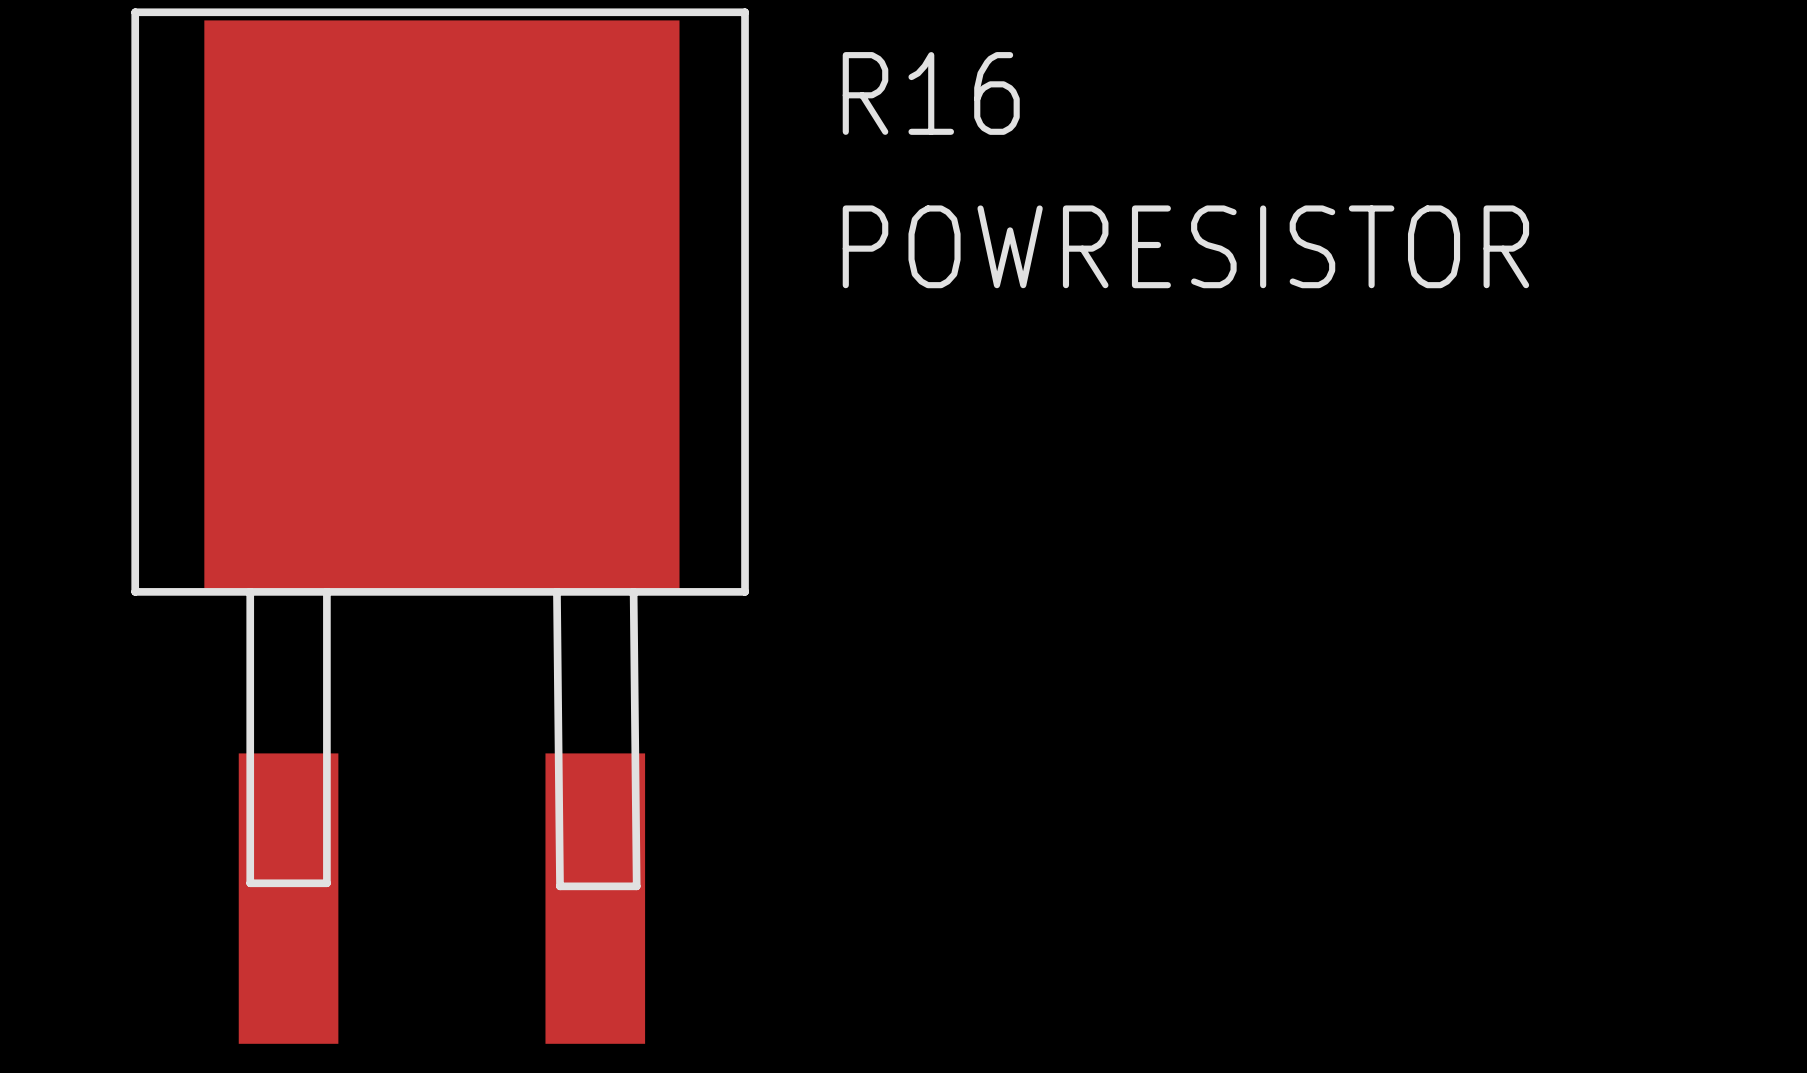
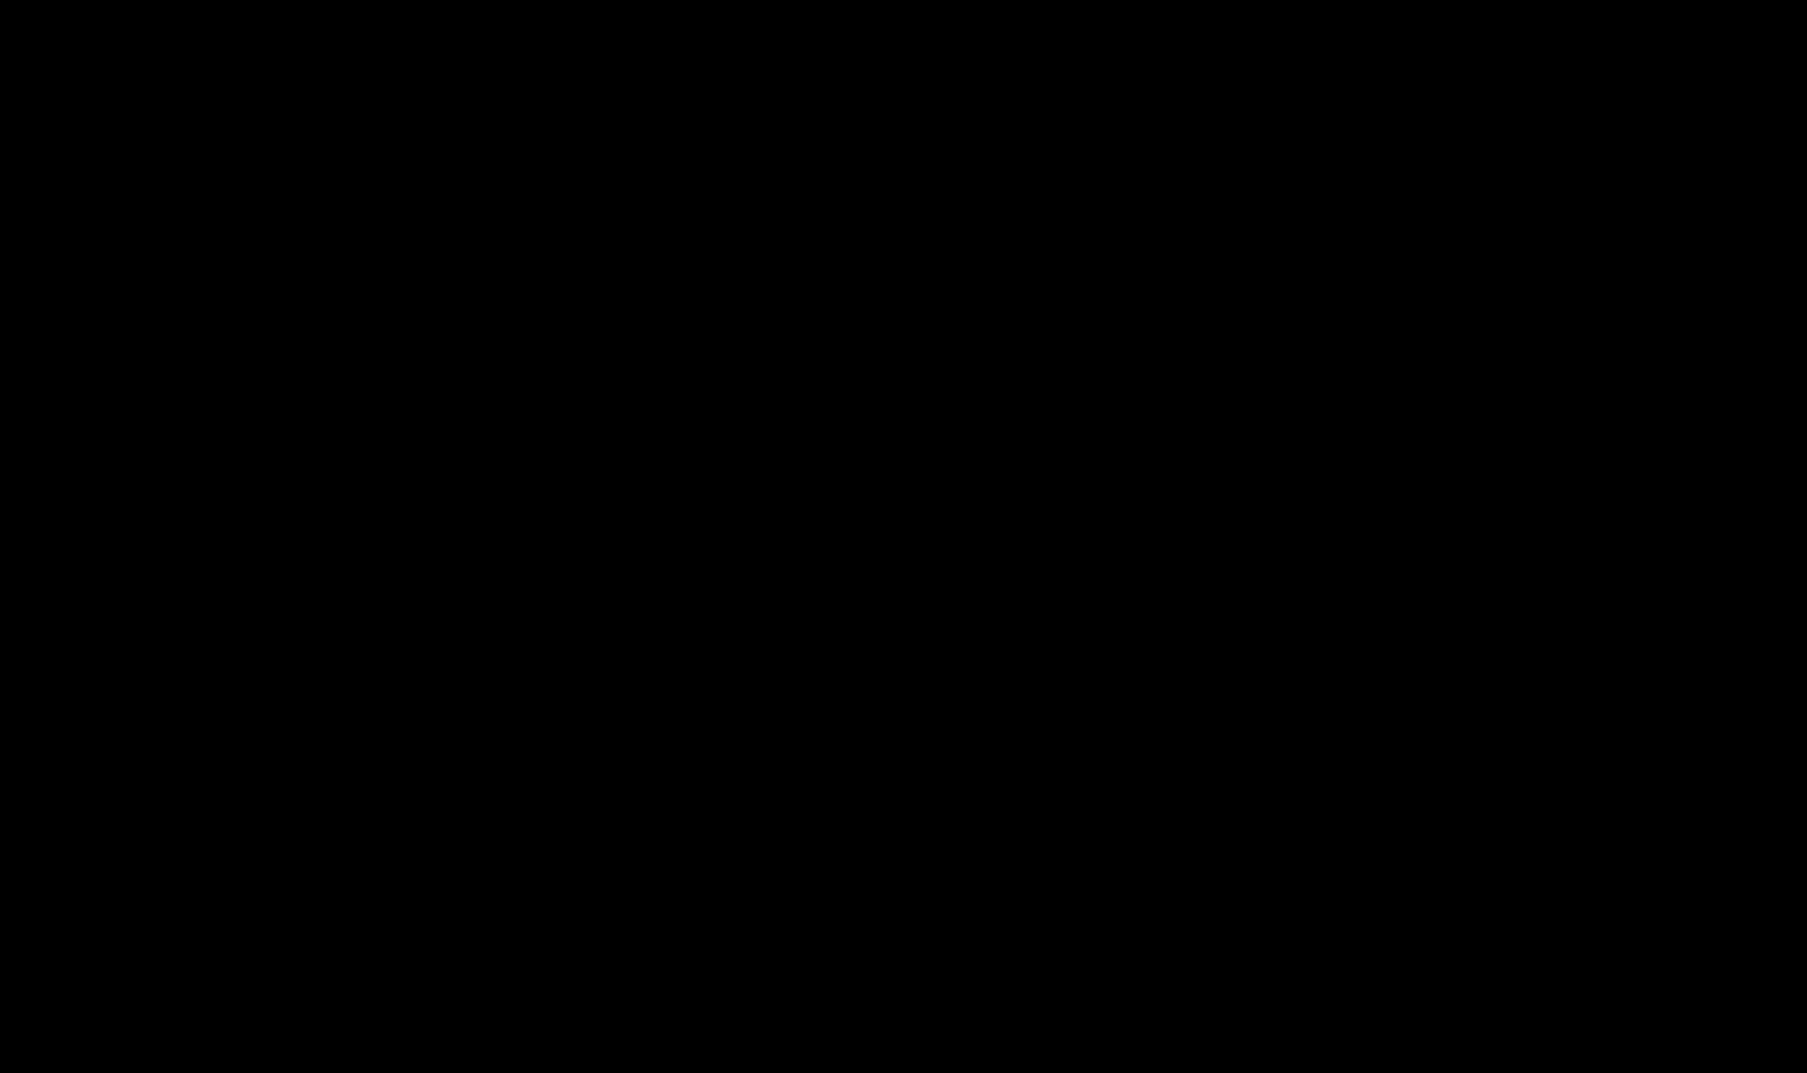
R16: POWRESISTOR (440, 526) -> none

